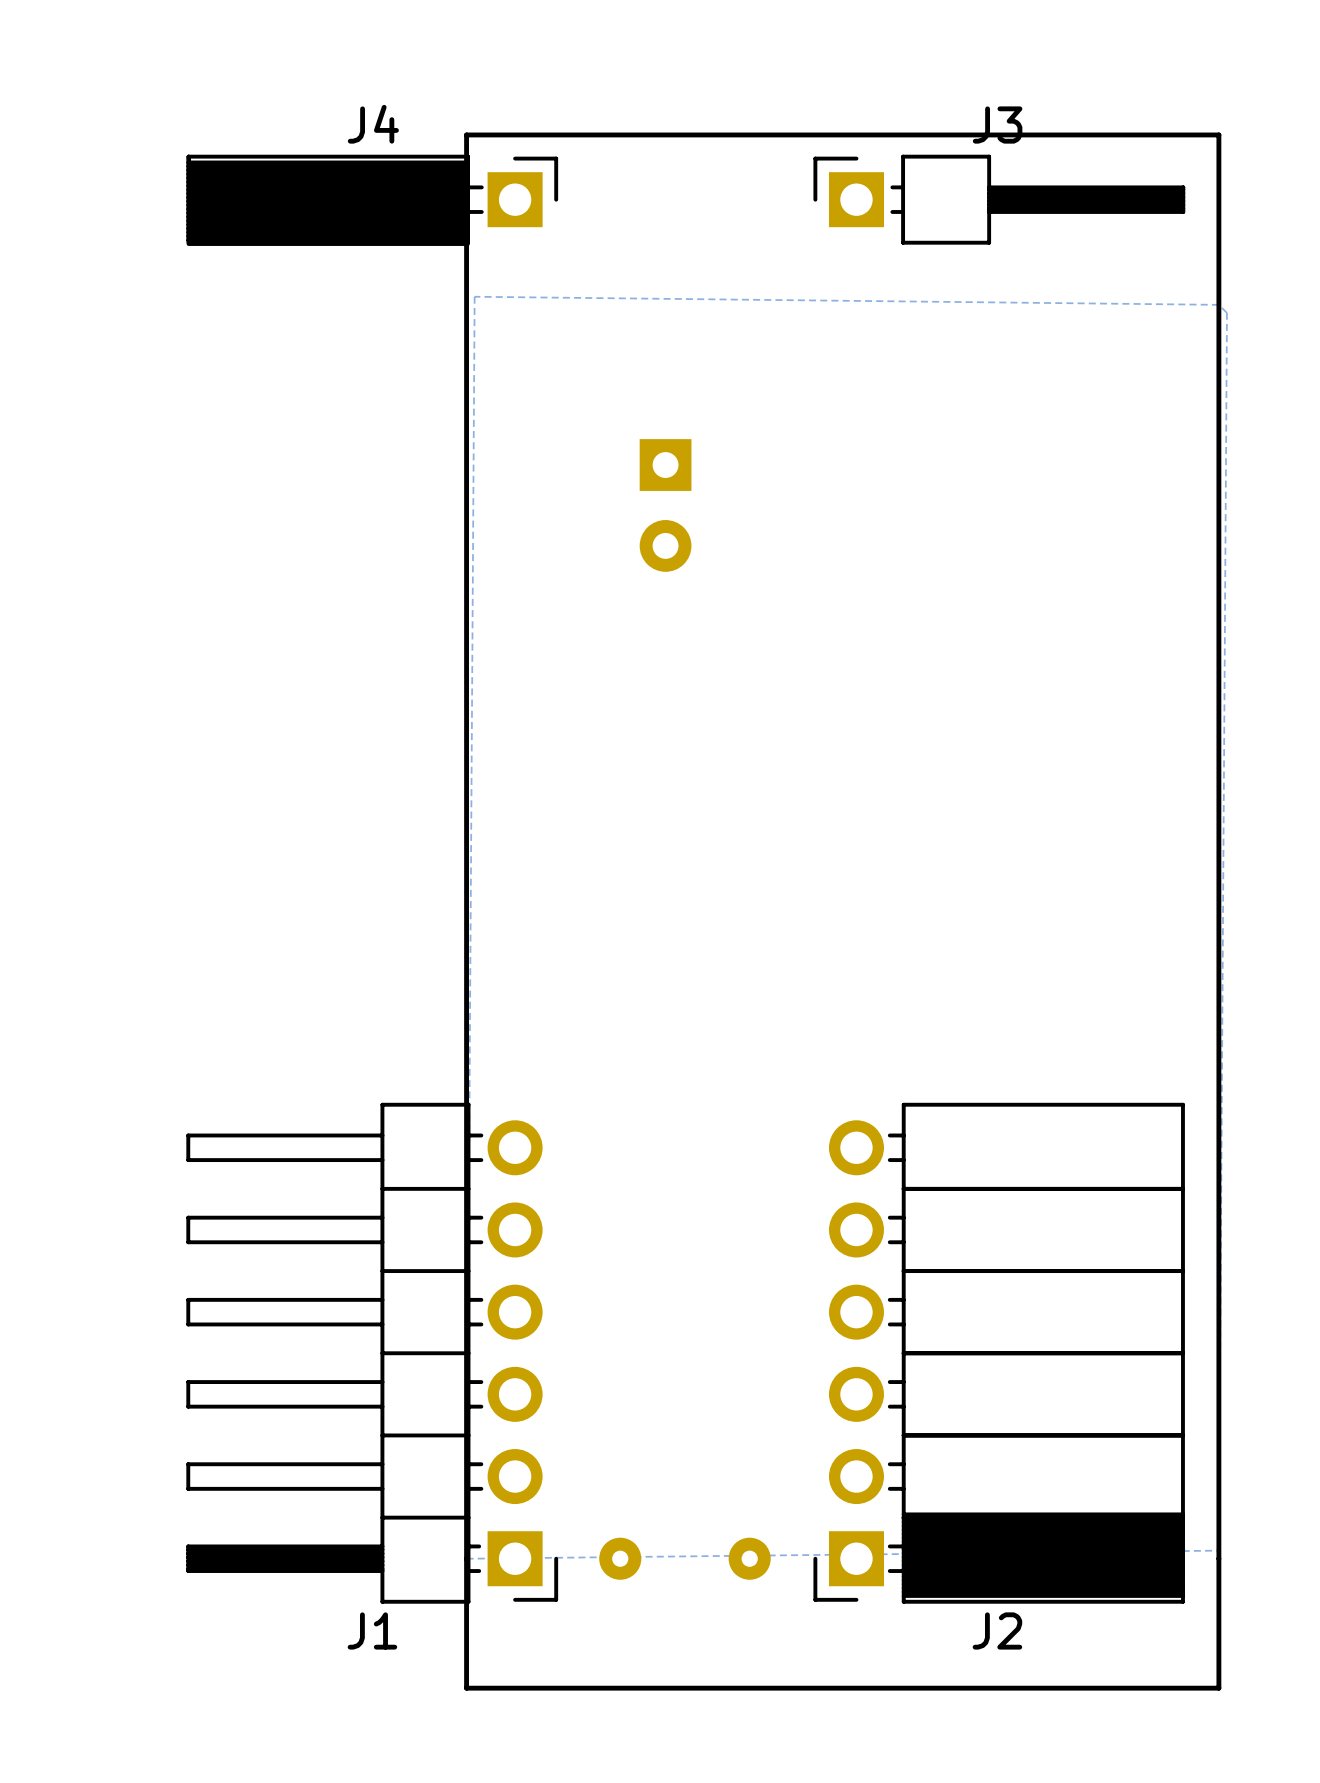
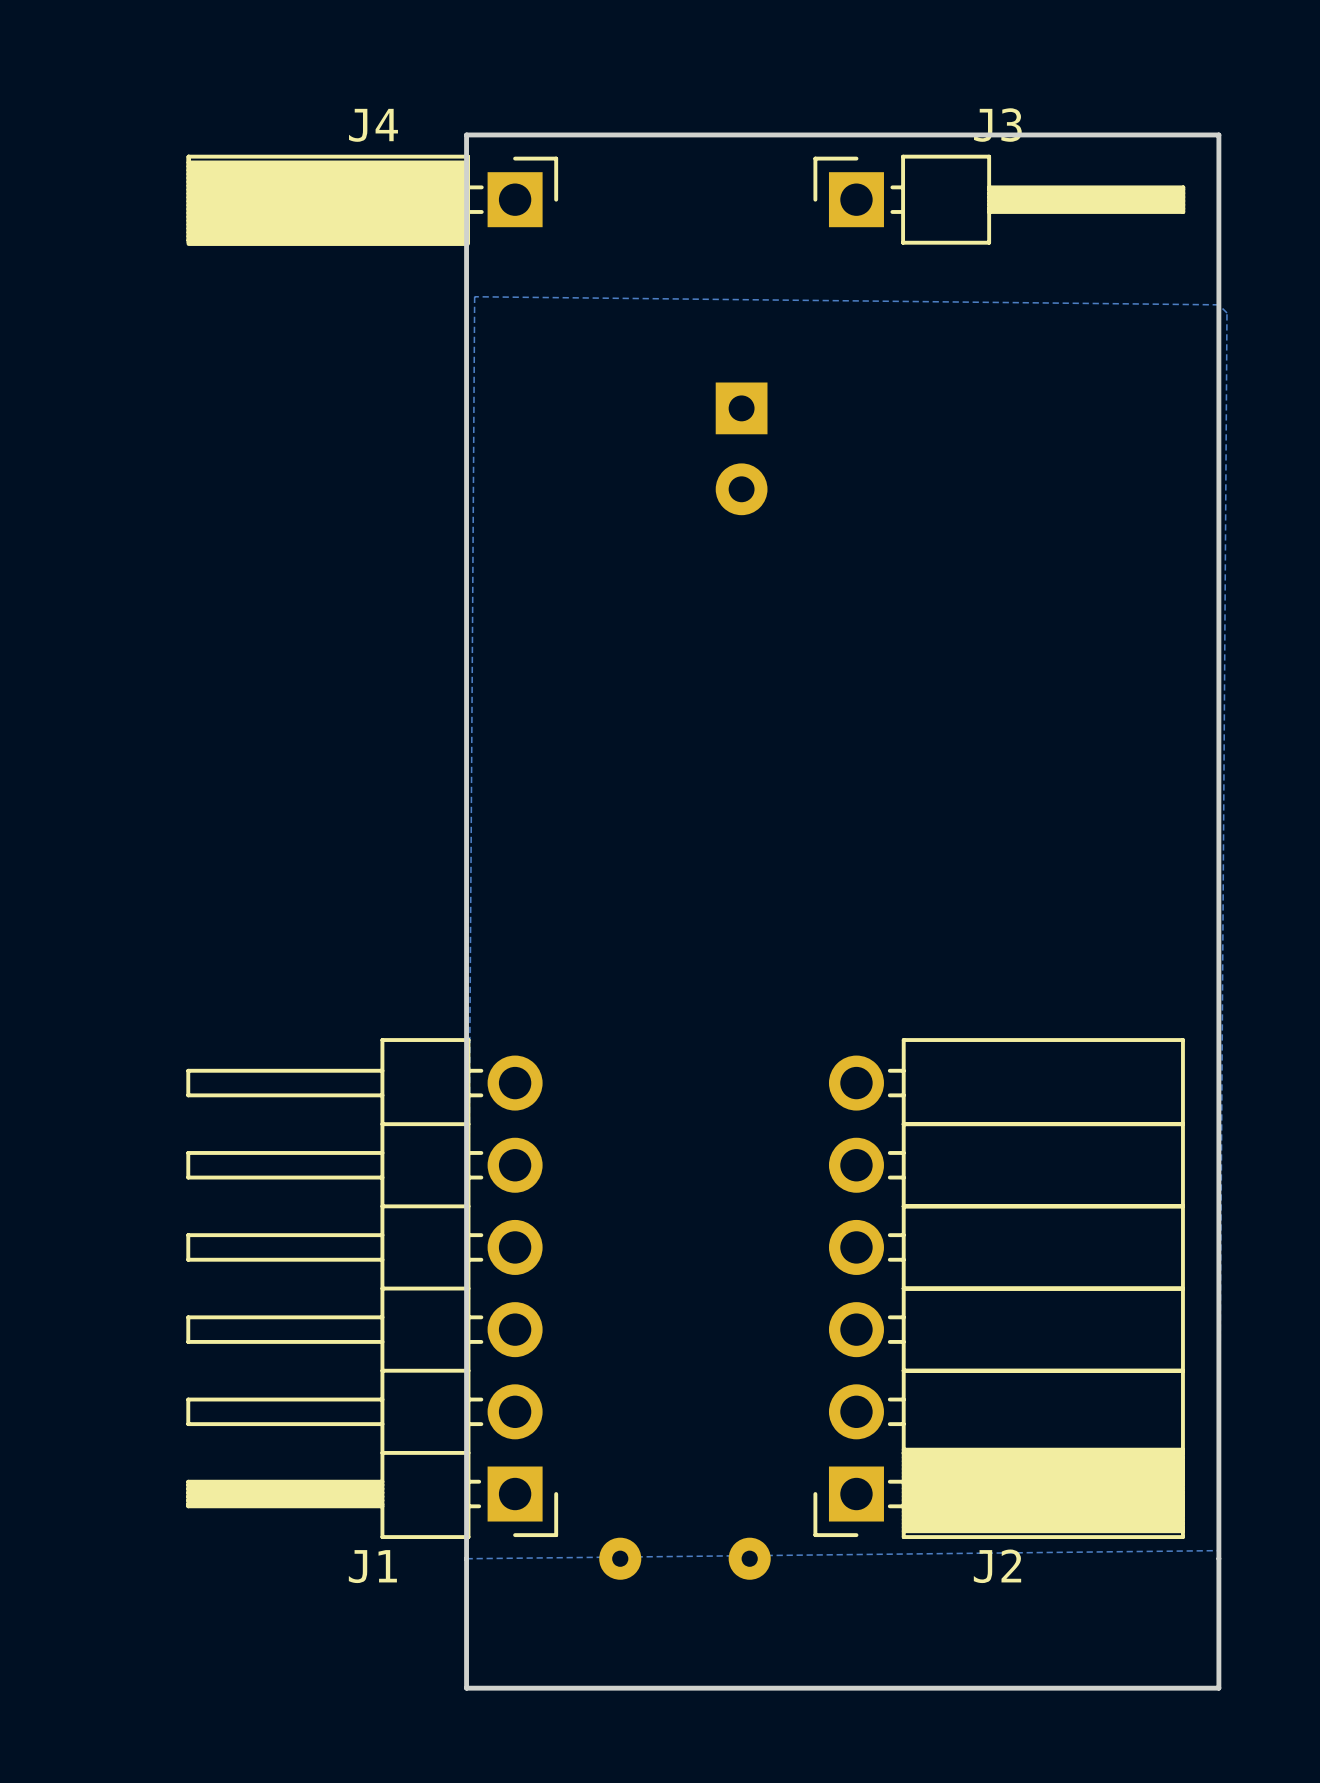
part position: (665, 505) -> (741, 448)
J1 position: (372, 1353) -> (372, 1288)
J2 position: (999, 1353) -> (999, 1288)

